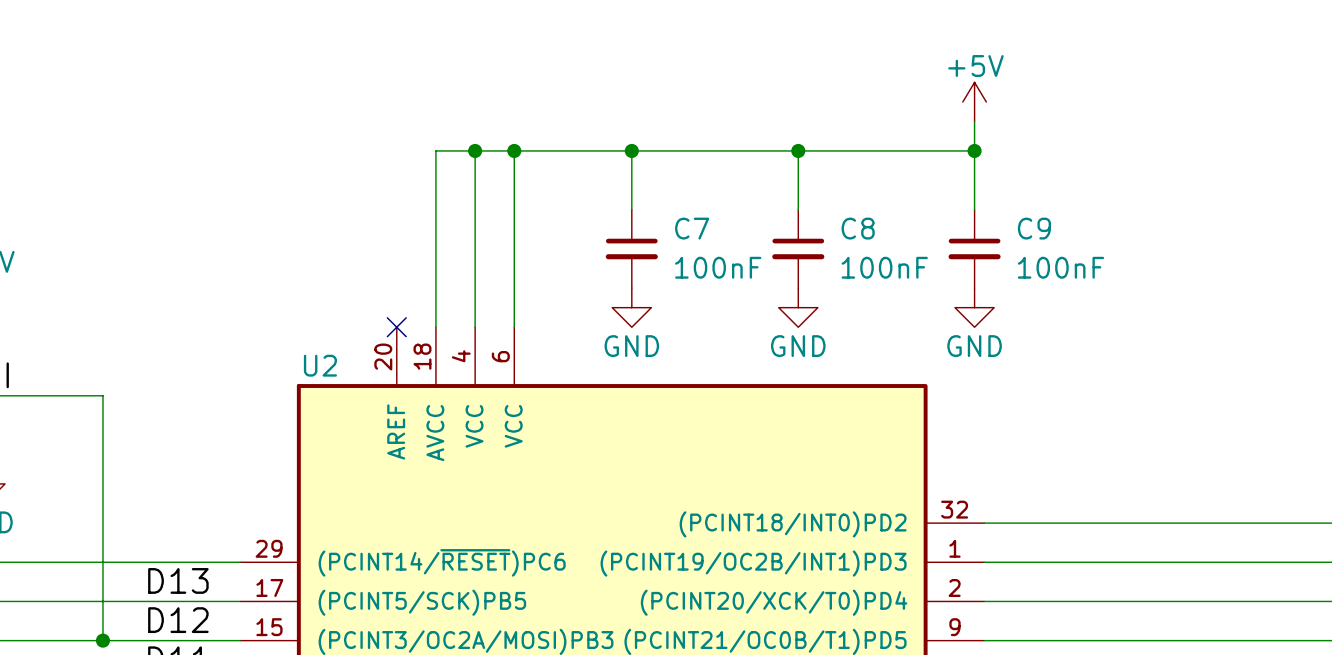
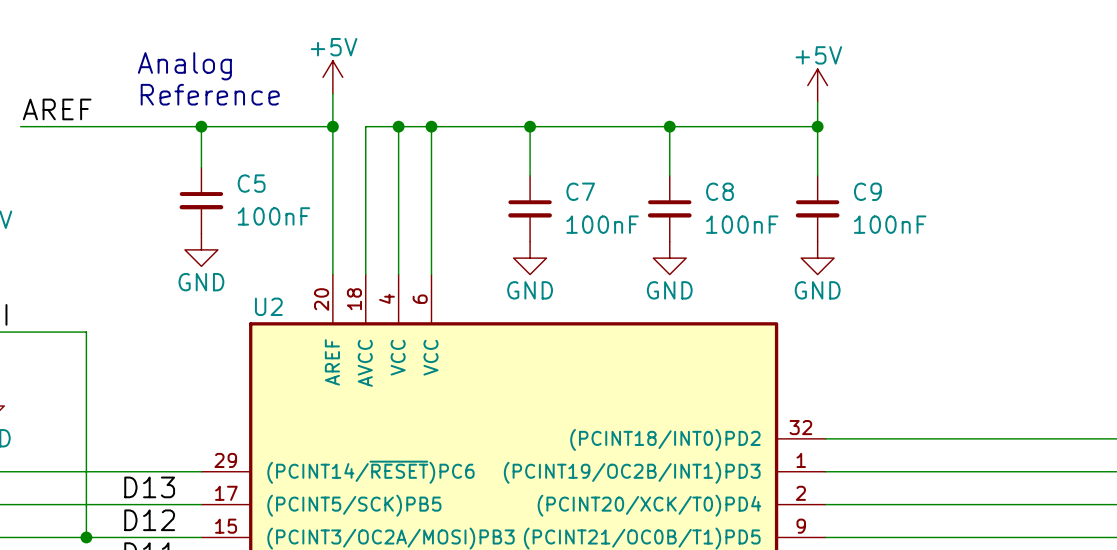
text: none -> Analog (184, 66)
power symbol: none -> +5V (332, 77)
wire: none -> (332, 93) (332, 274)
text: none -> Reference (210, 94)
label: none -> AREF (57, 109)
wire: none -> (20, 126) (332, 126)
wire: none -> (201, 126) (201, 167)
junction: none -> (201, 126)
junction: none -> (332, 126)
C5: none -> 100nF (201, 200)
power symbol: none -> GND (201, 249)
no-connect mark: (396, 327) -> none

